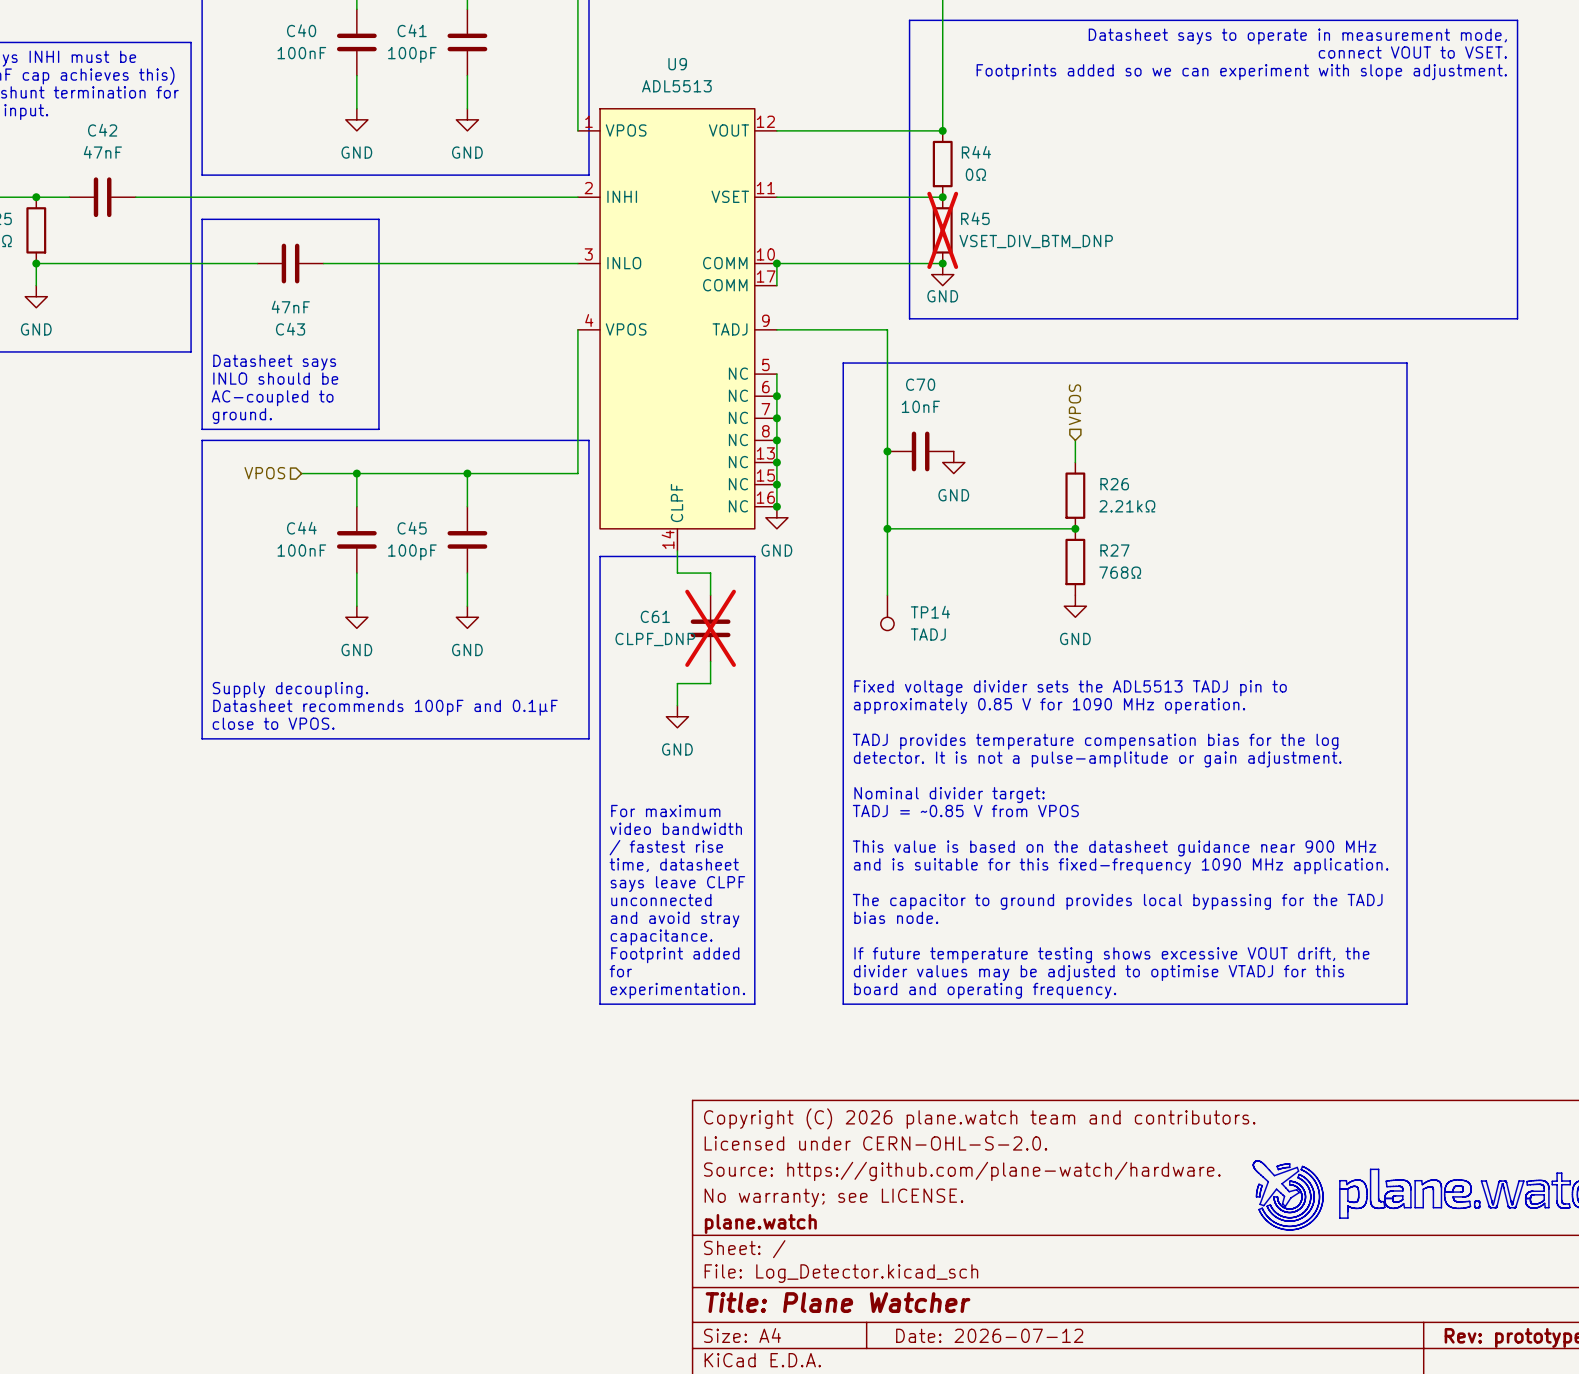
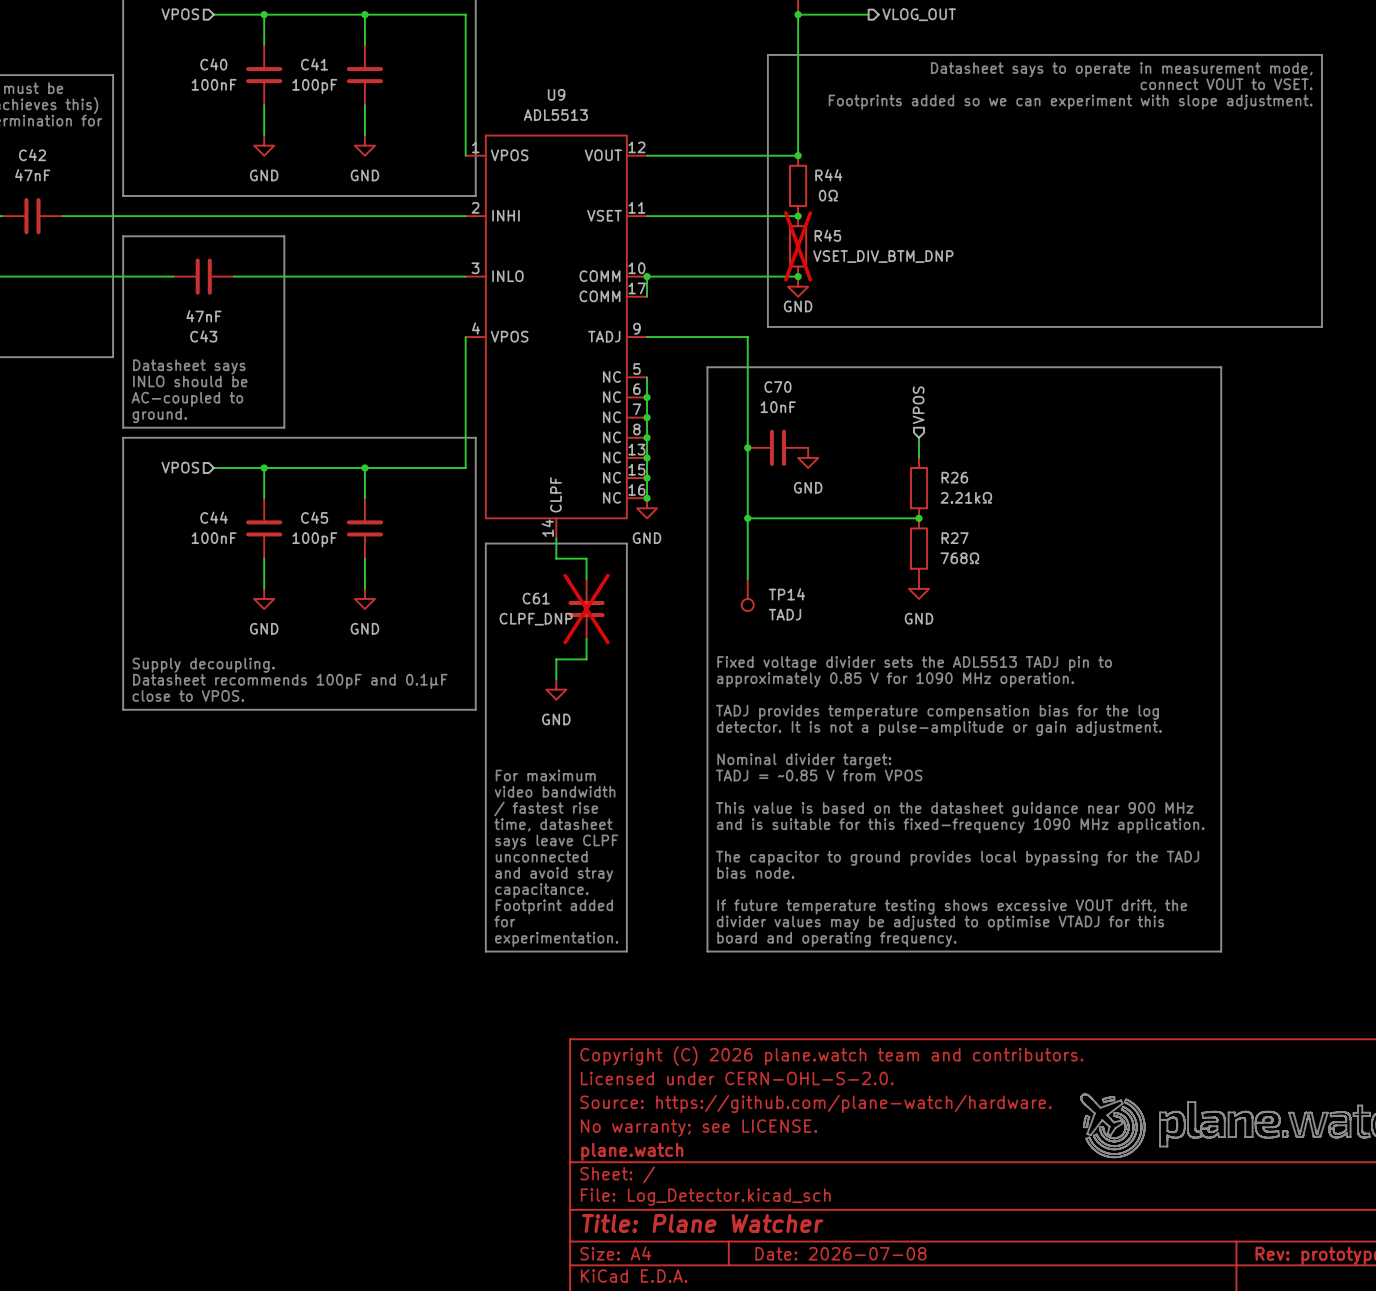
title block: Date: 2026-07-12 (989, 1335) -> Date: 2026-07-08 (840, 1253)

